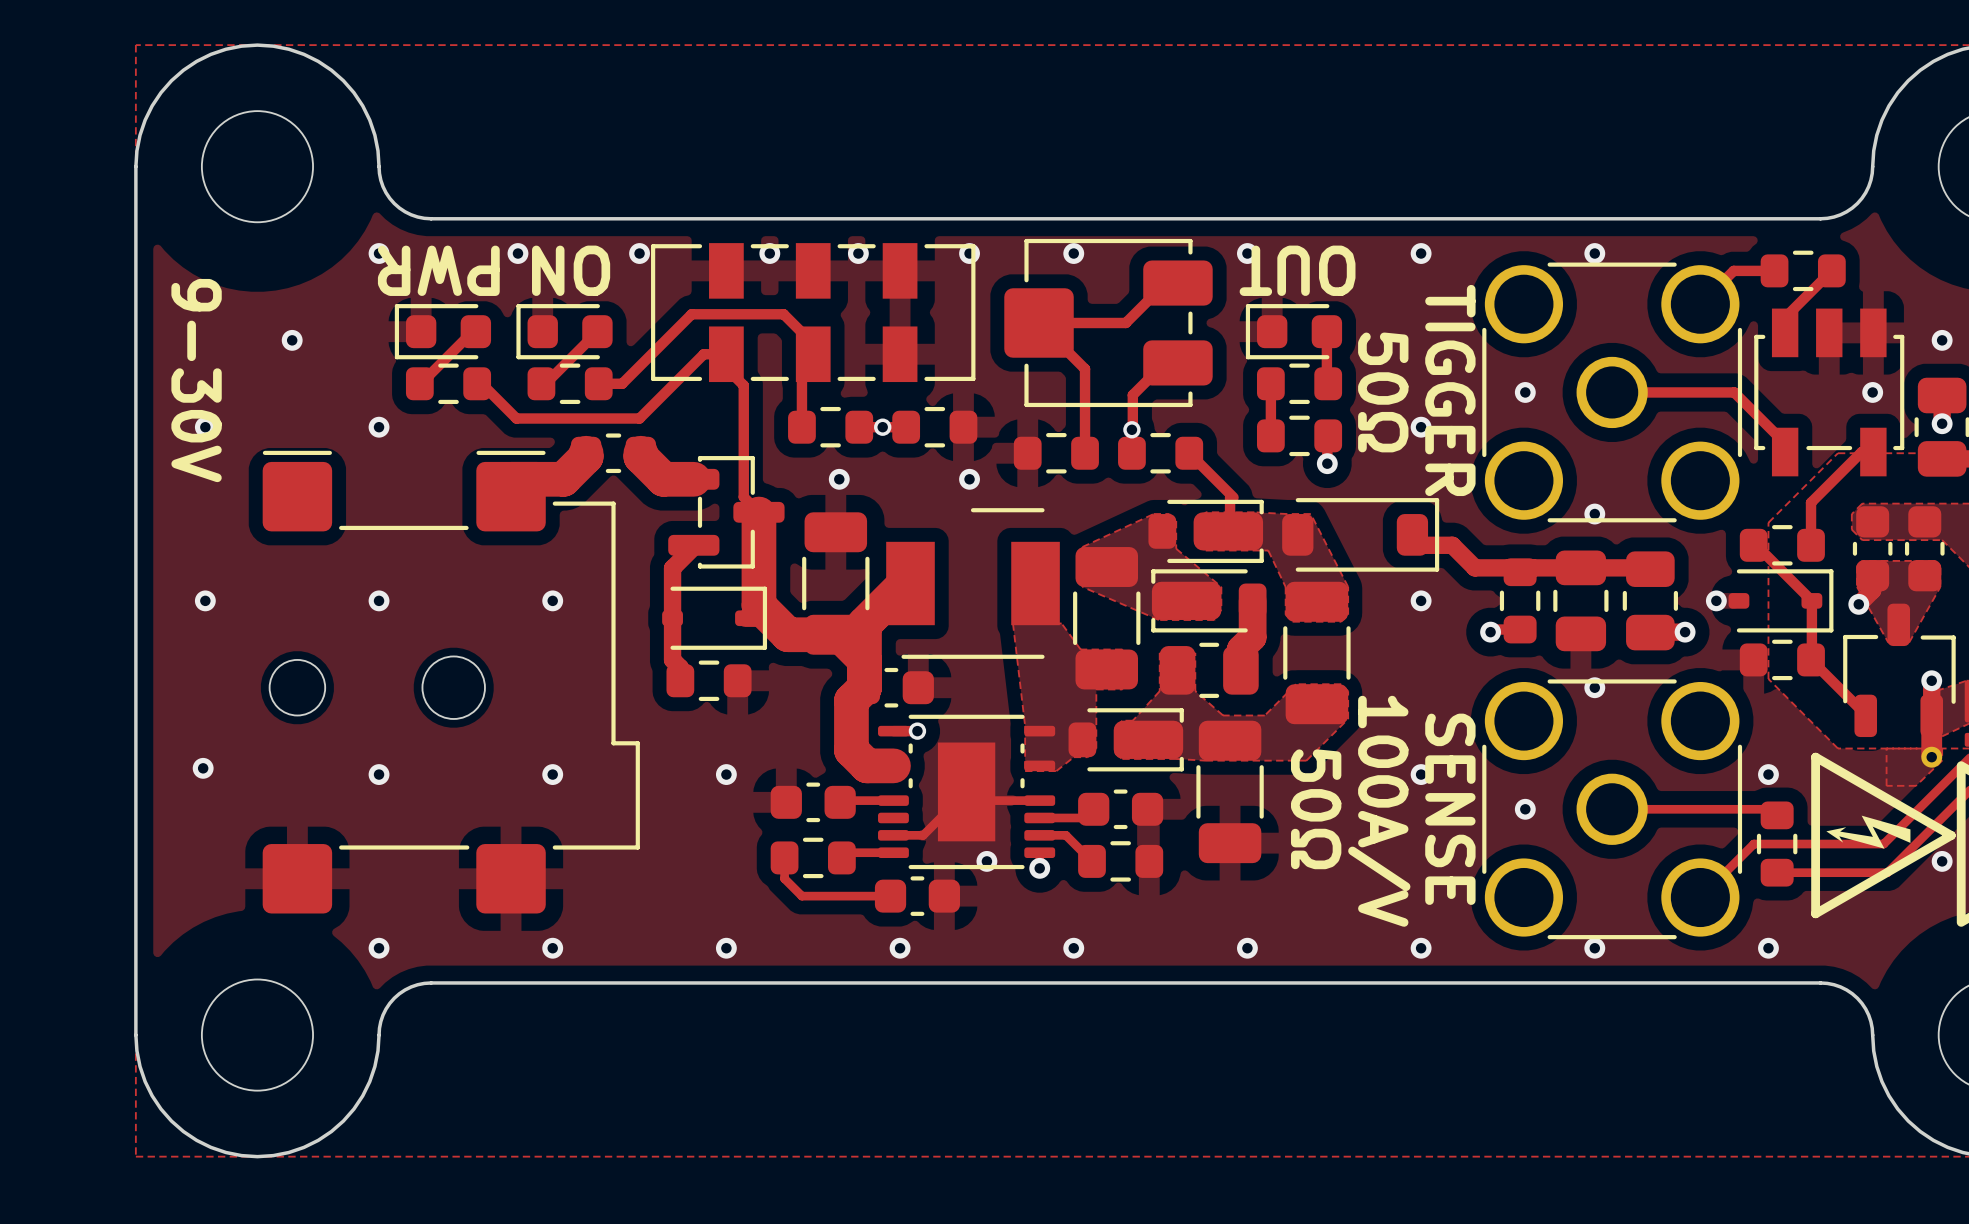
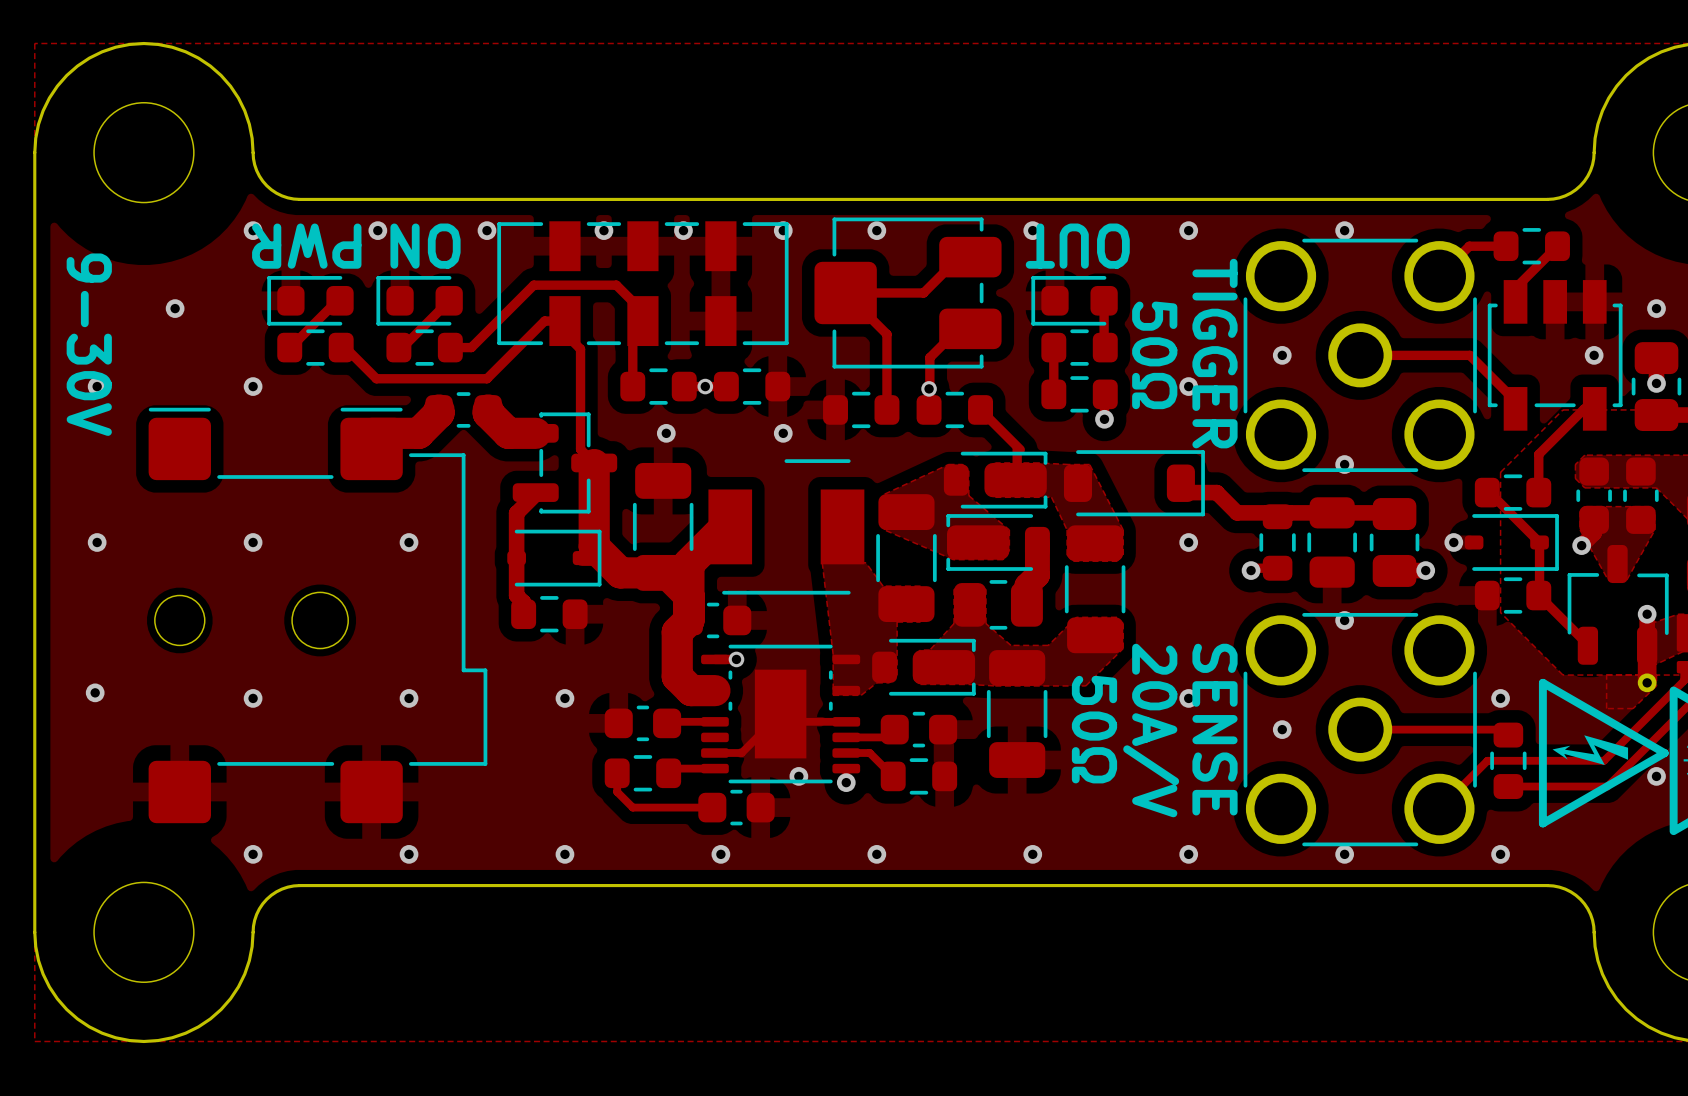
text: 100A/V (1379, 811) -> 20A/V (1151, 730)

